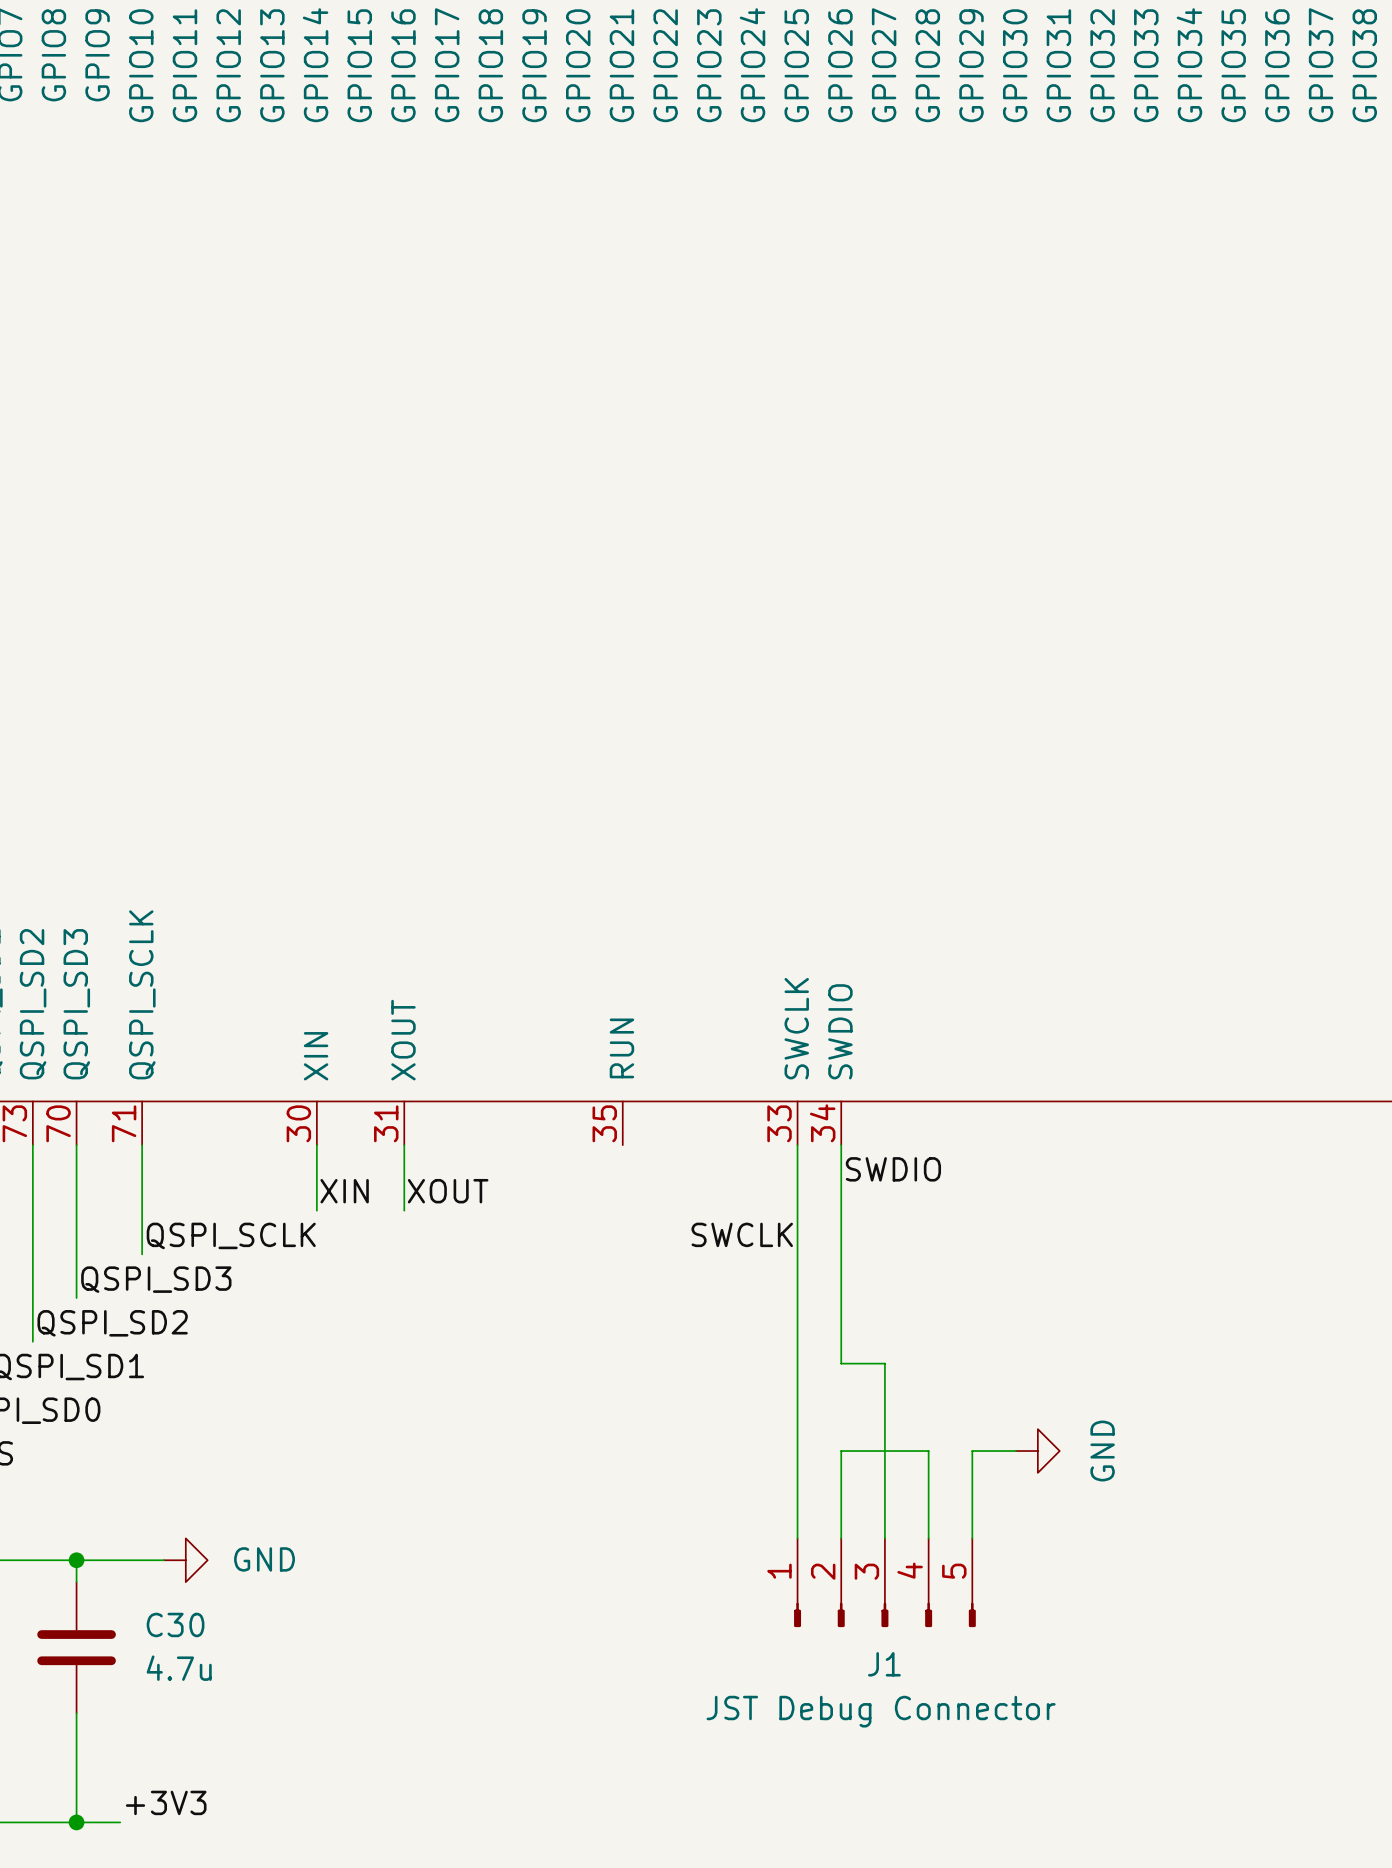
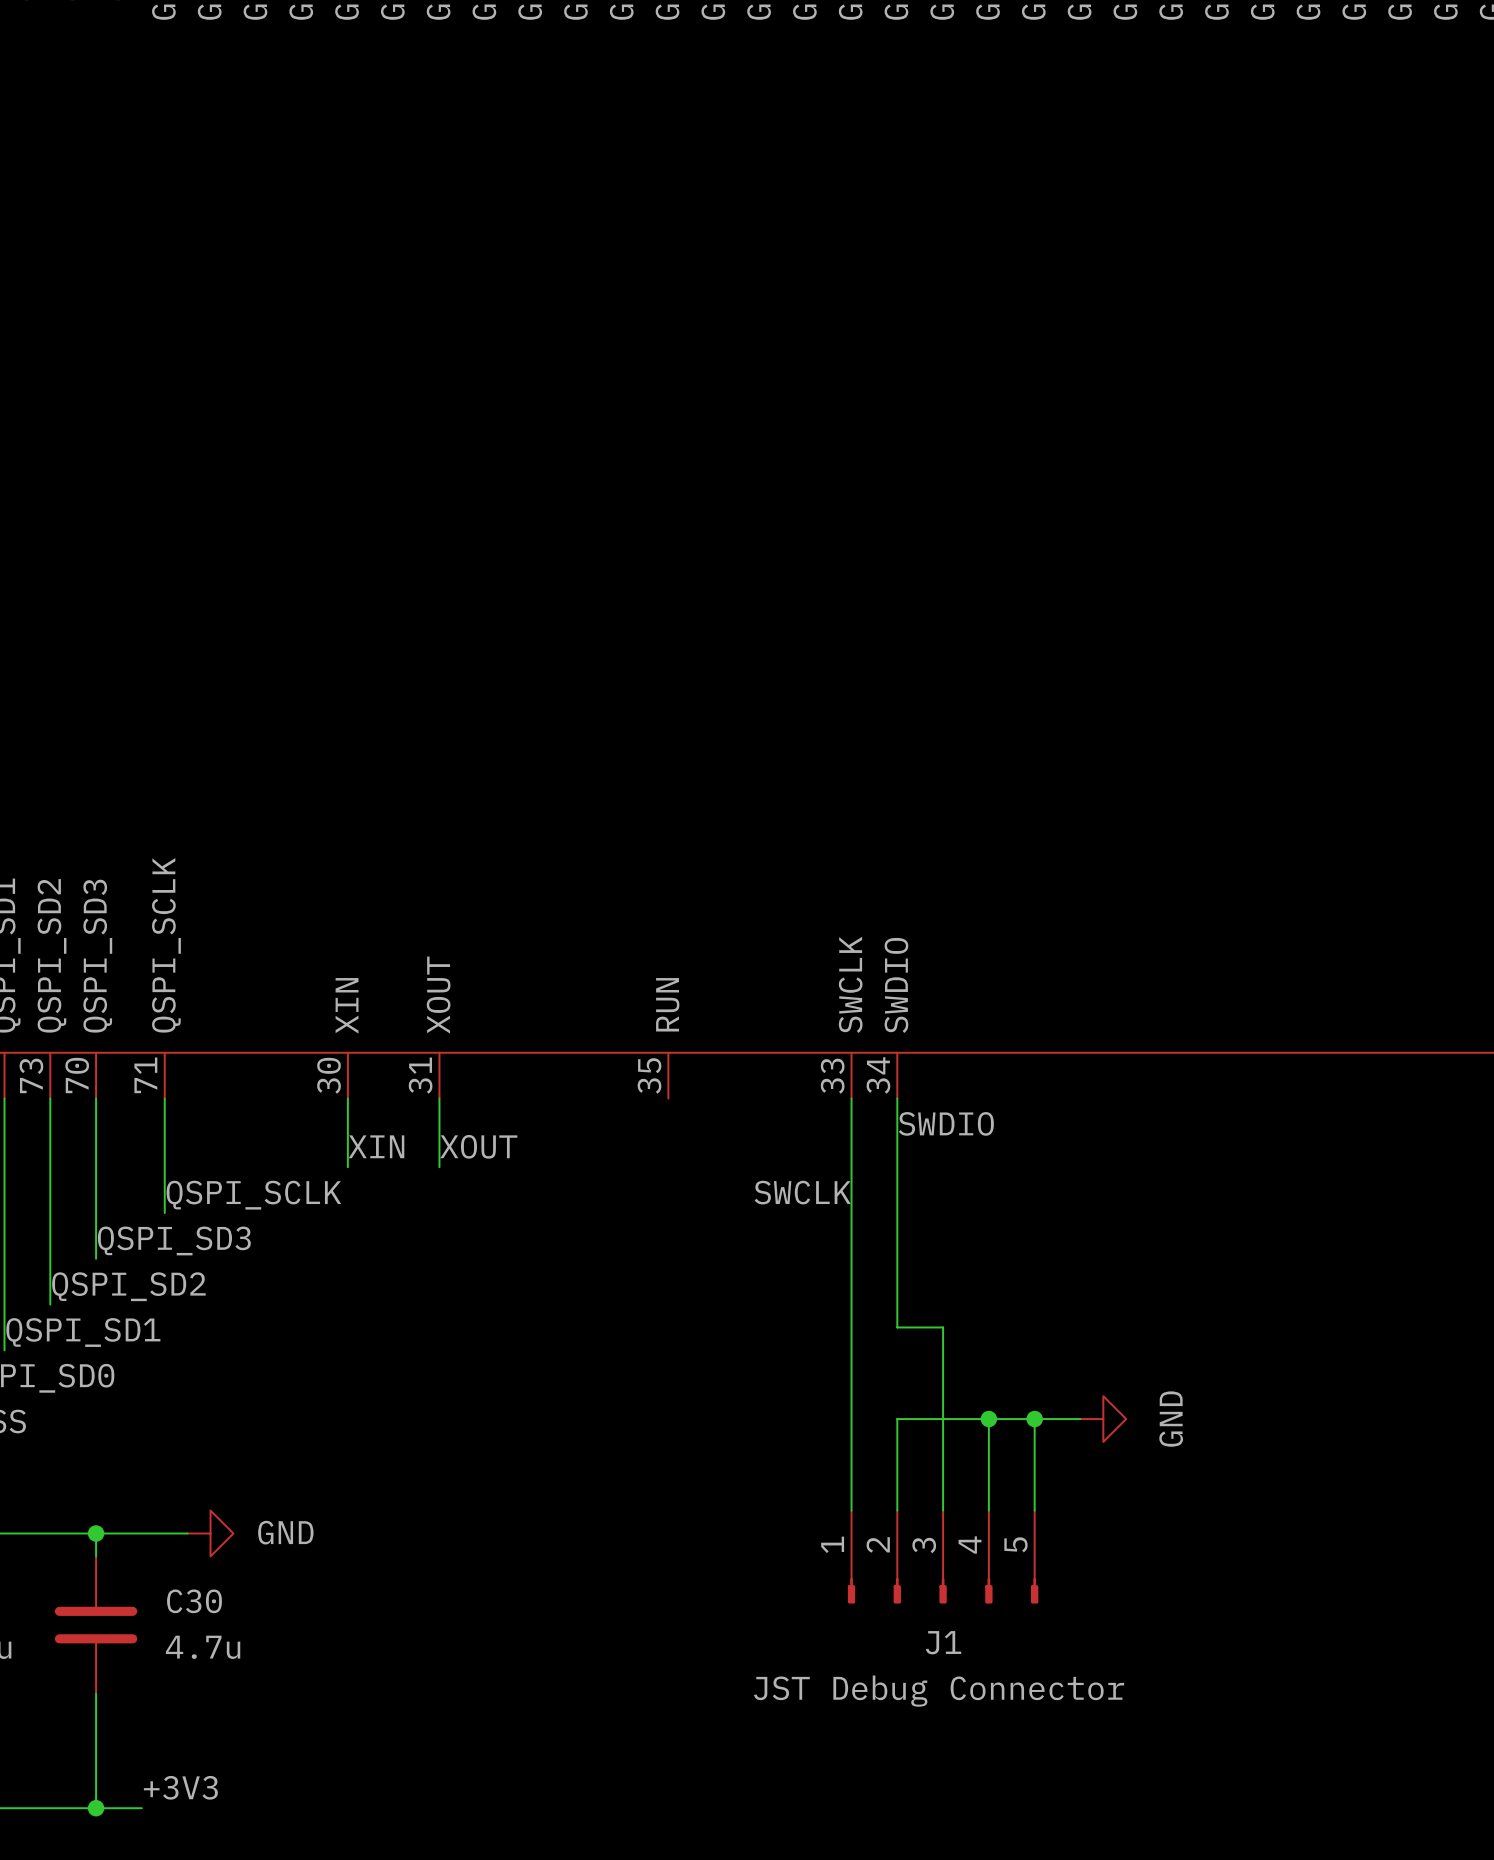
wire: none -> (988, 1419) (1034, 1419)
junction: none -> (988, 1419)
junction: none -> (1034, 1419)

